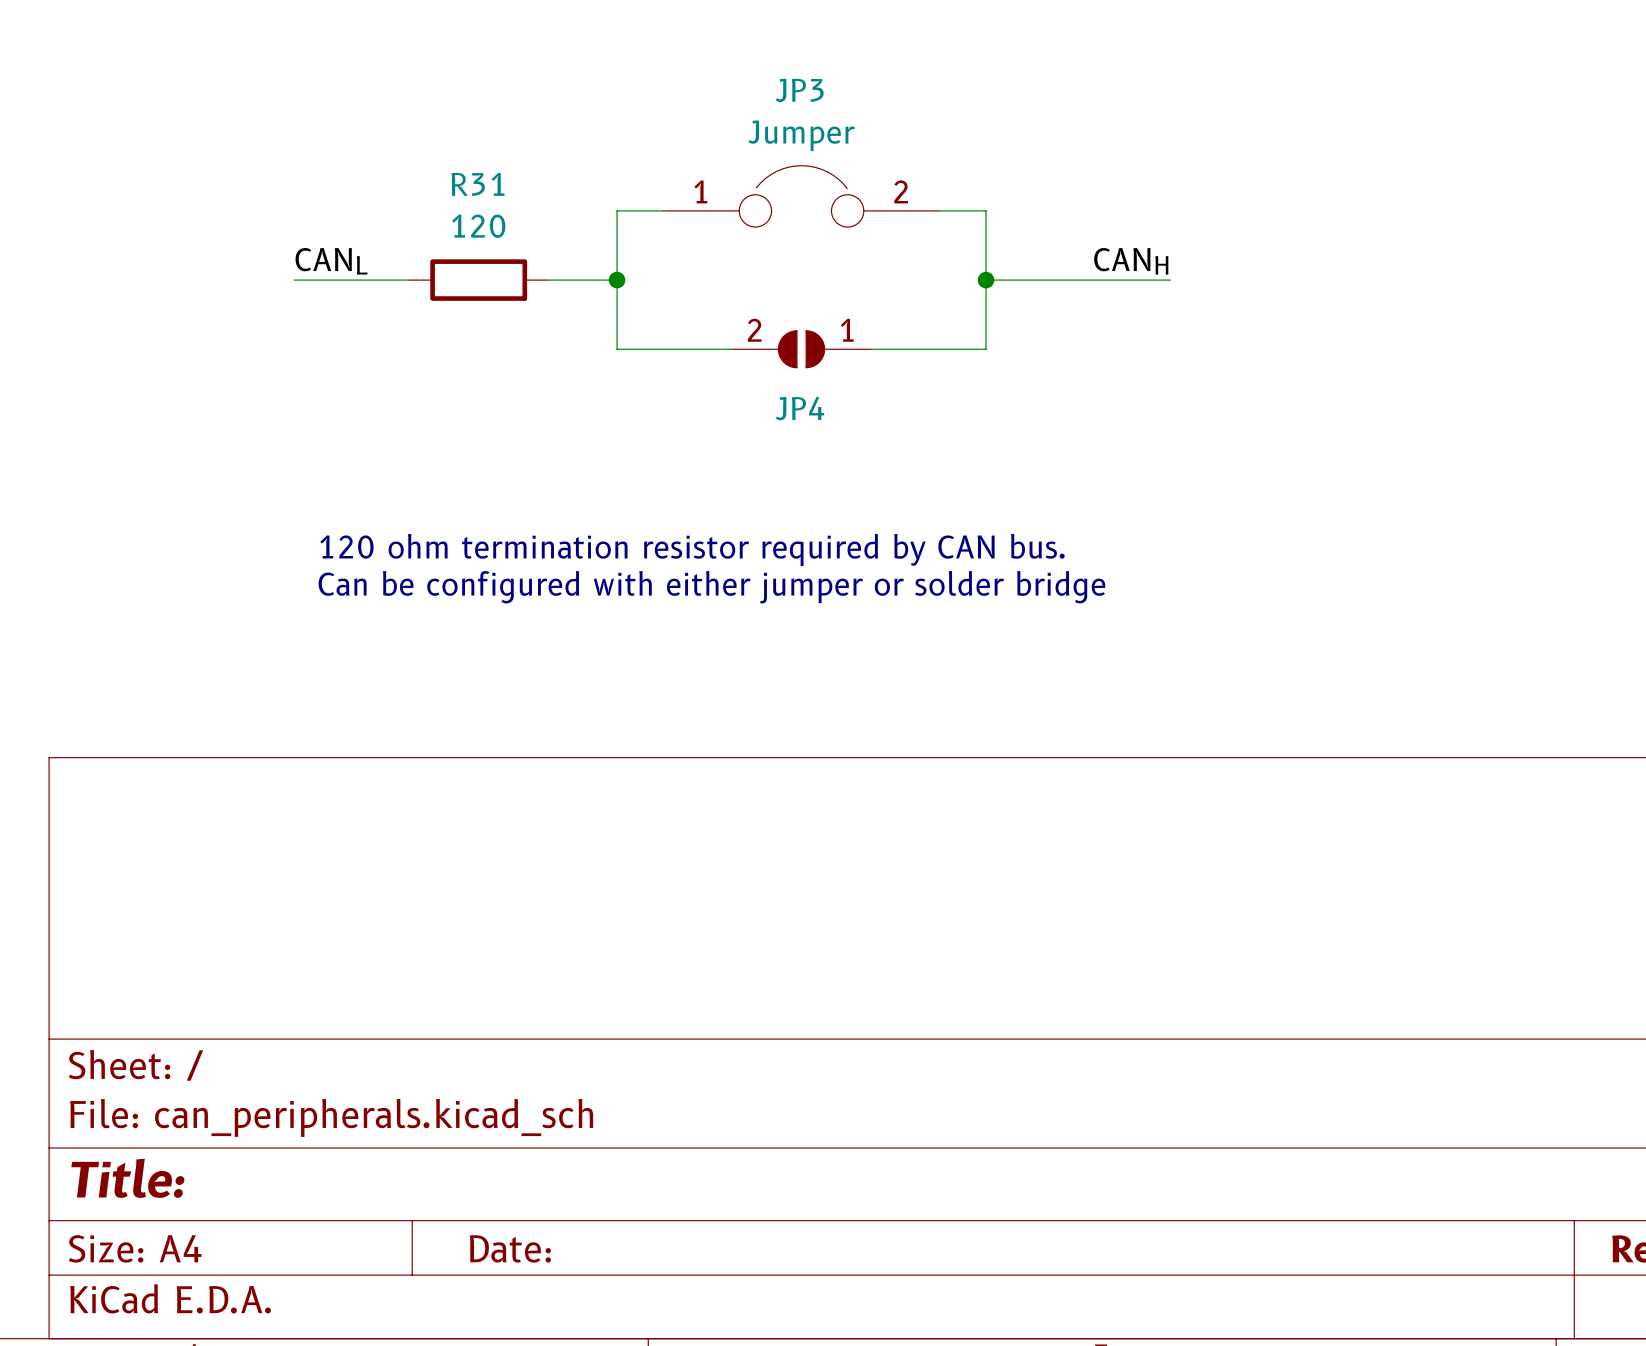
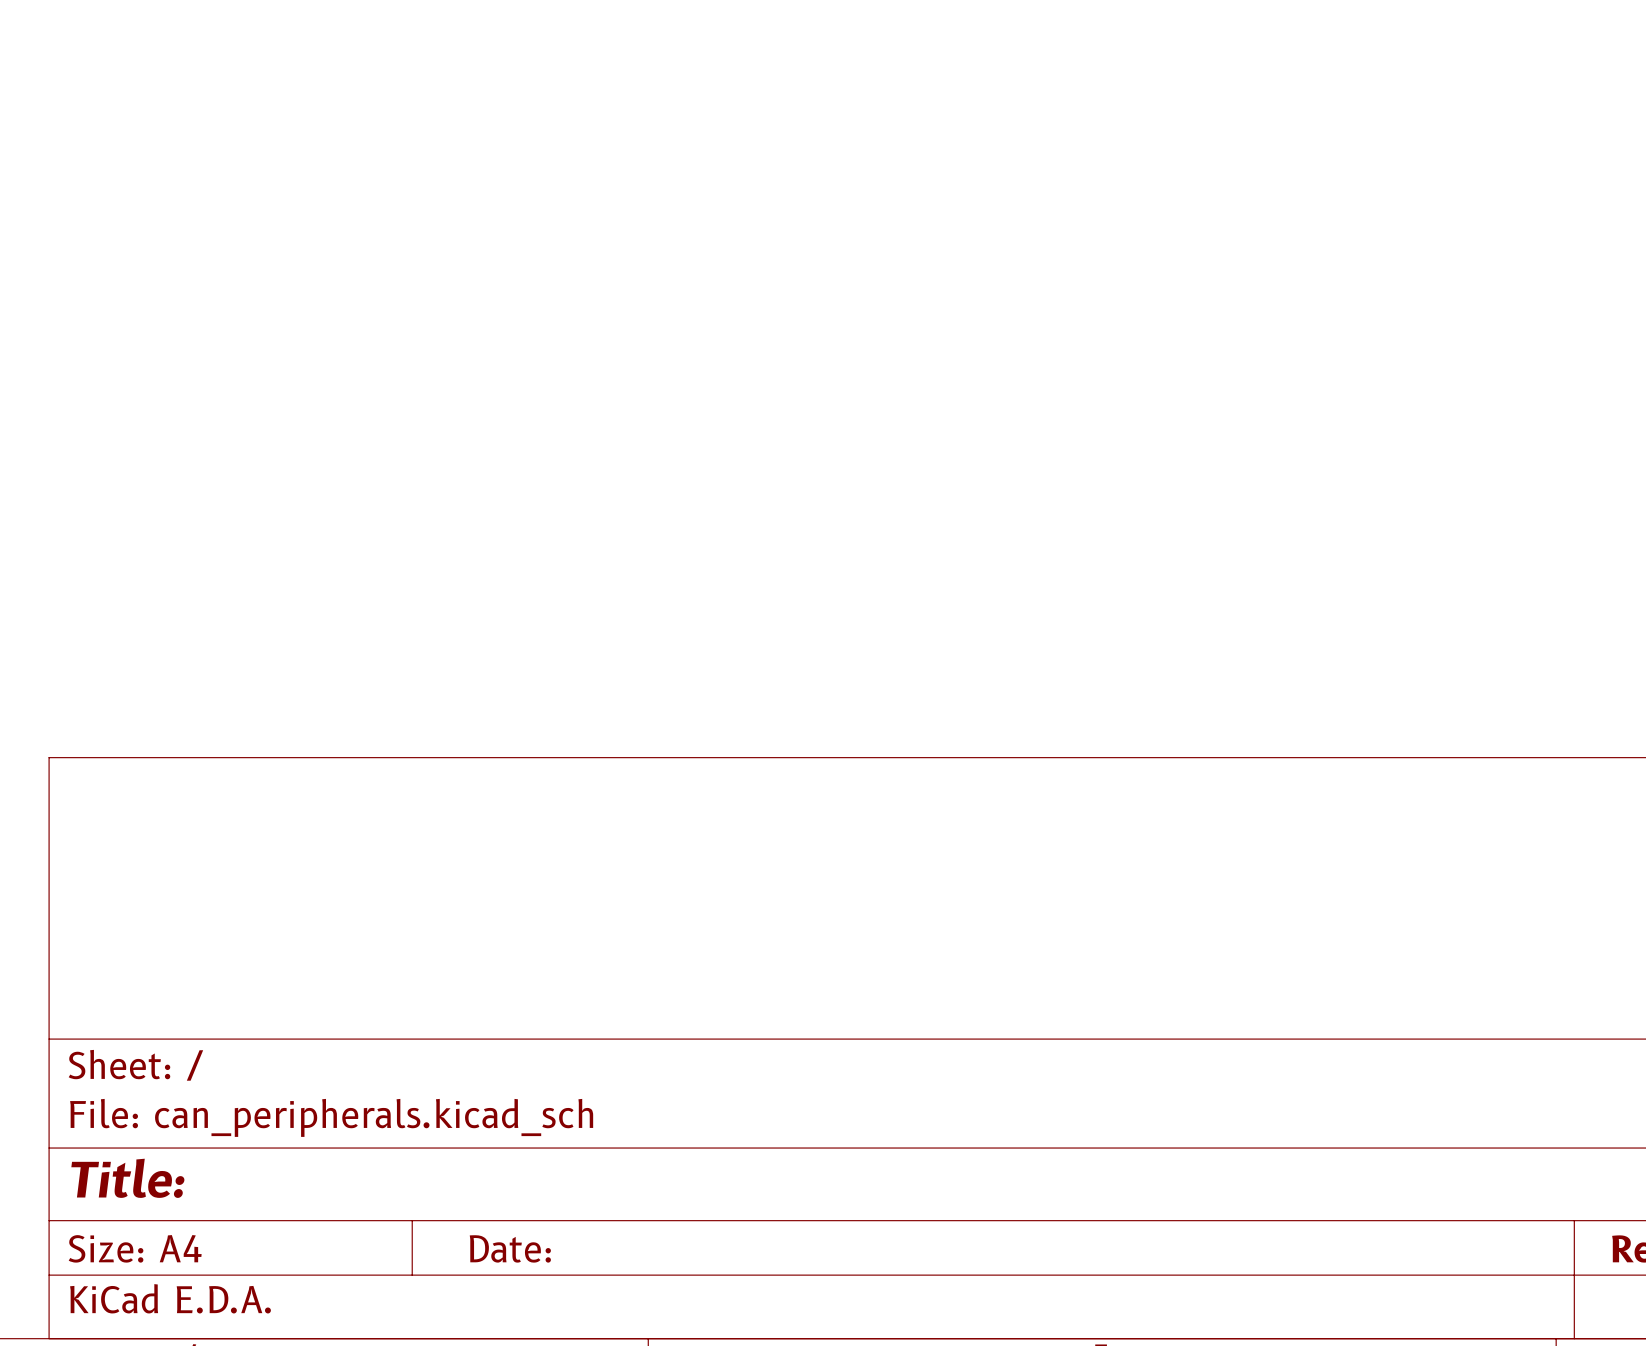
JP3: Jumper (801, 196) -> none
wire: (663, 210) (617, 210) (617, 349) (732, 349) -> none
wire: (939, 210) (986, 210) (986, 349) (870, 349) -> none
label: CANL (331, 261) -> none
label: CANH (1131, 261) -> none
wire: (294, 280) (409, 280) -> none
R31: 120 (478, 280) -> none
wire: (547, 280) (617, 280) -> none
junction: (617, 280) -> none
wire: (986, 280) (1170, 280) -> none
junction: (986, 280) -> none
JP4: (801, 349) -> none
text: 120 ohm termination resistor required by CAN bus. (692, 549) -> none
text: Can be configured with either jumper or solder bridge (711, 587) -> none

